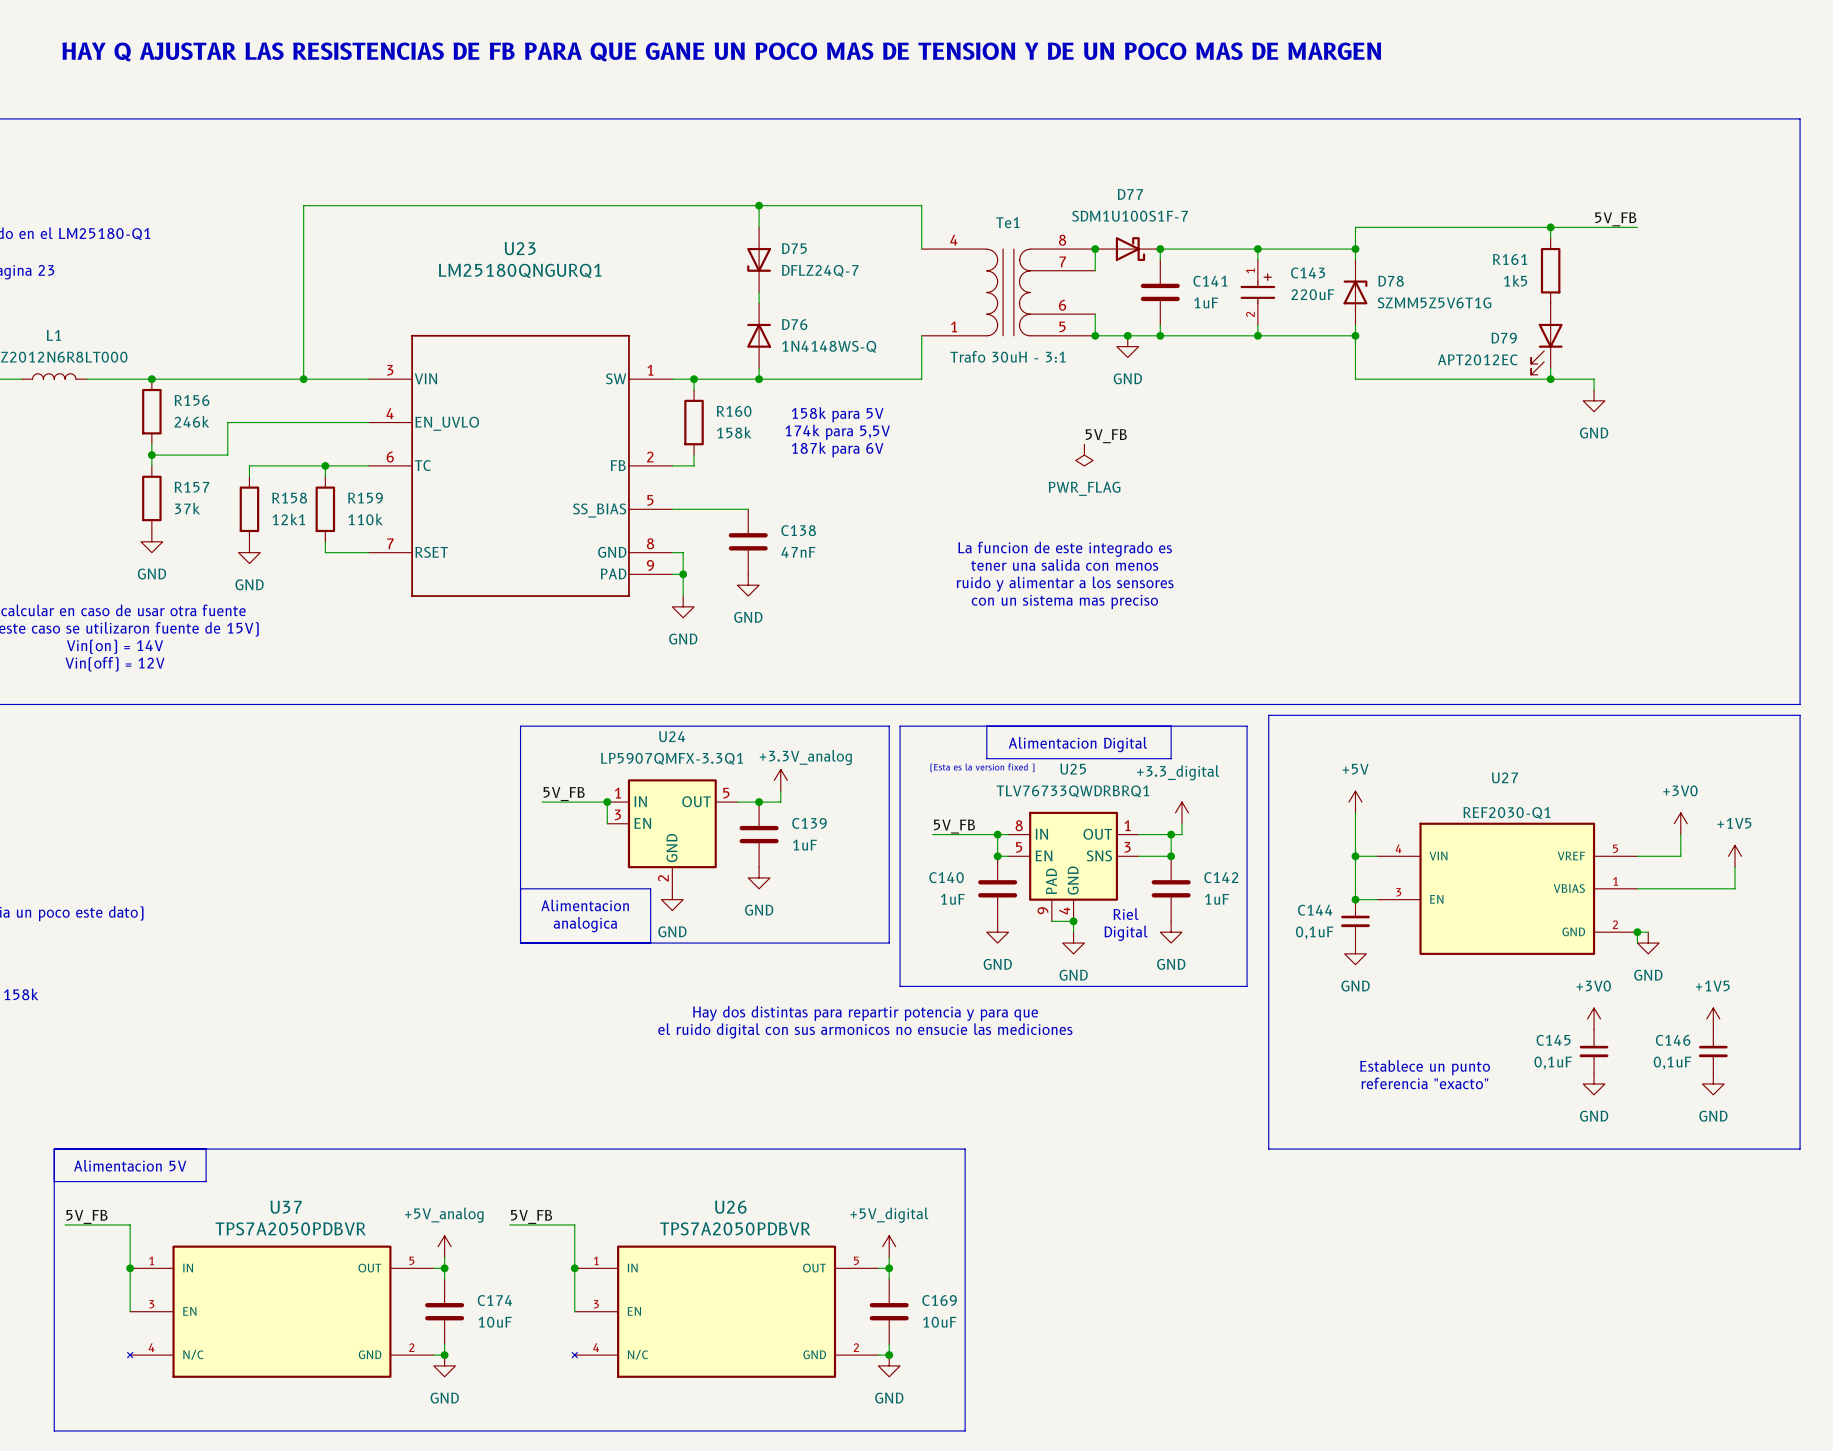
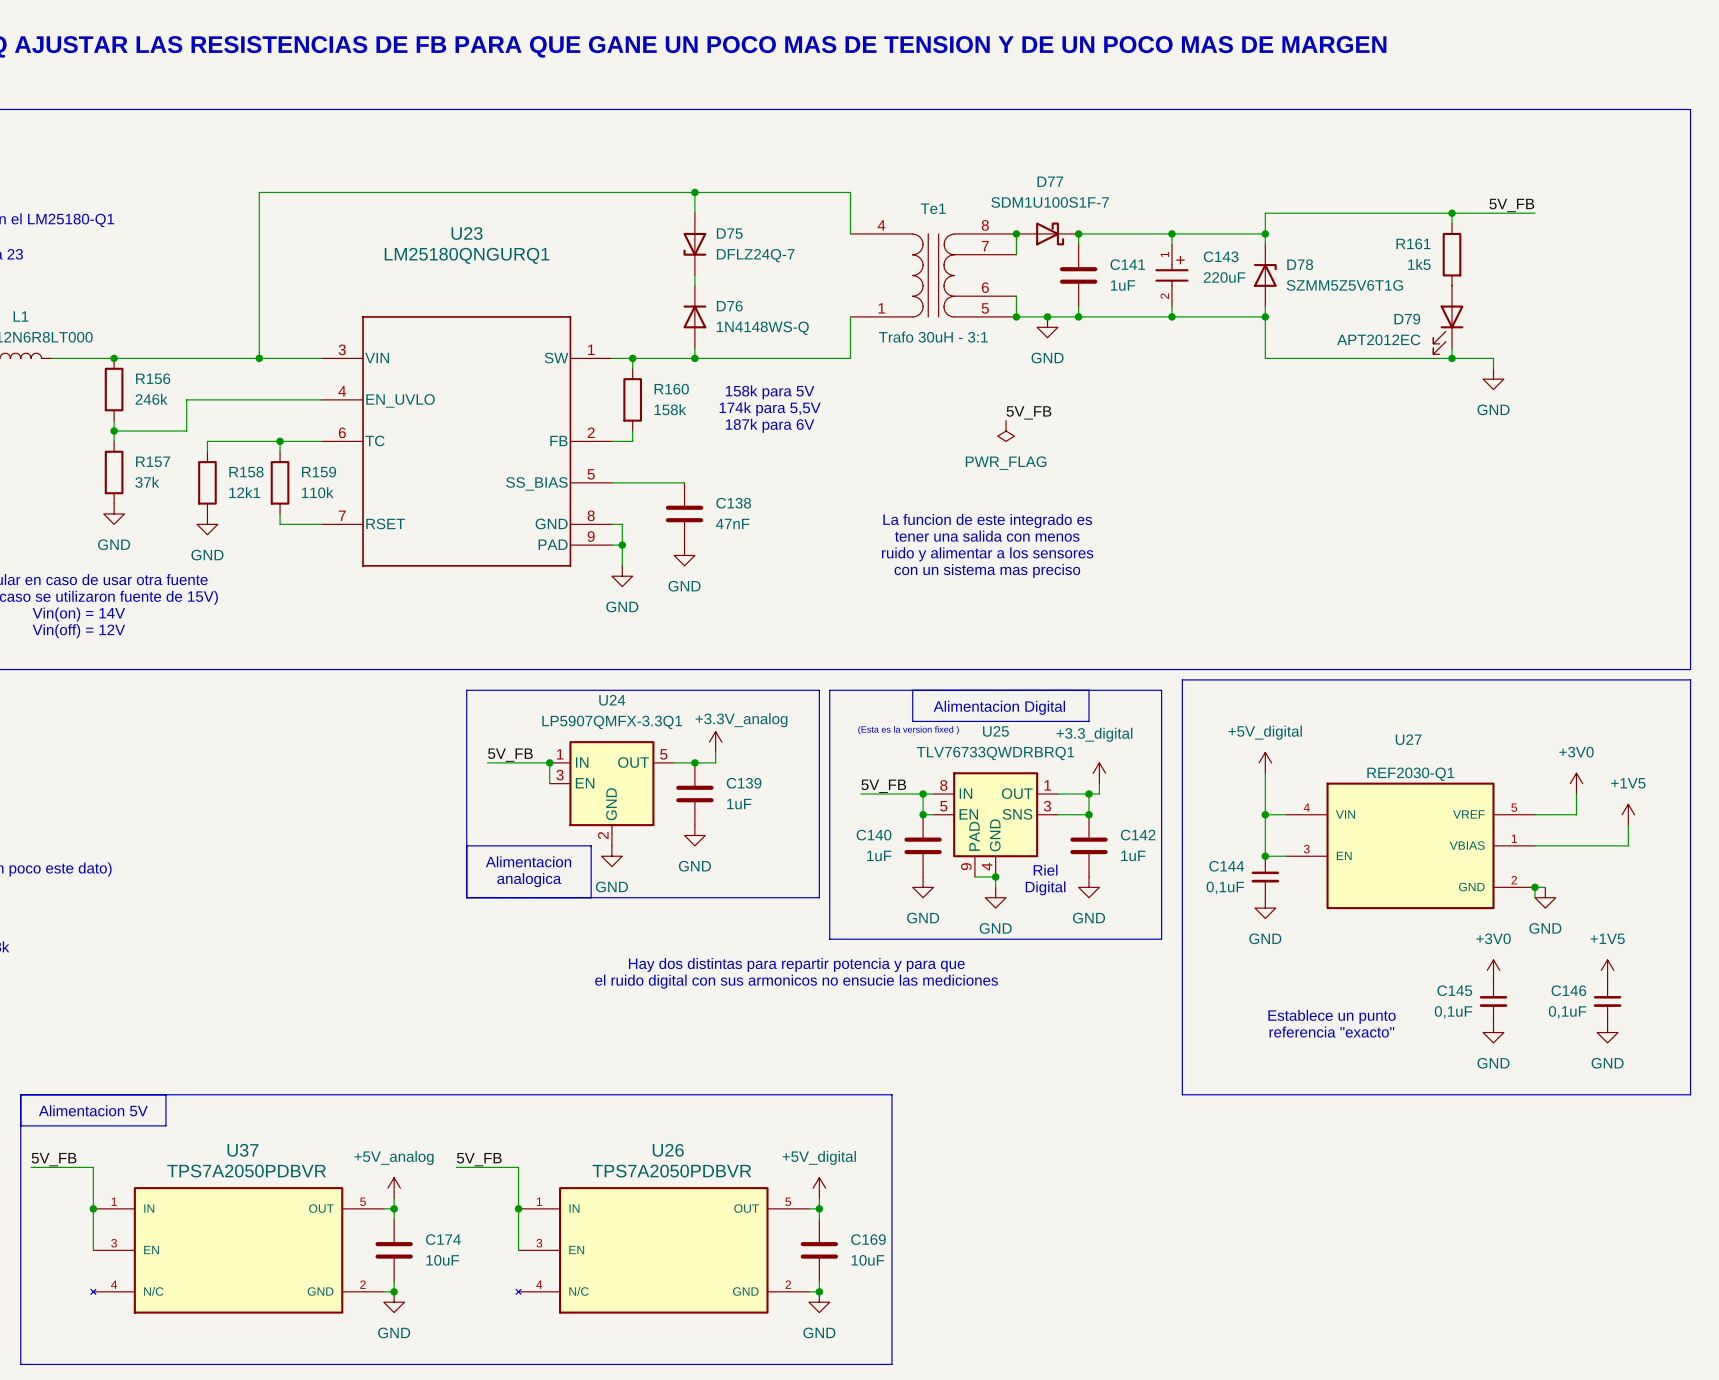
power symbol: +5V (1355, 802) -> +5V_digital (1265, 762)

